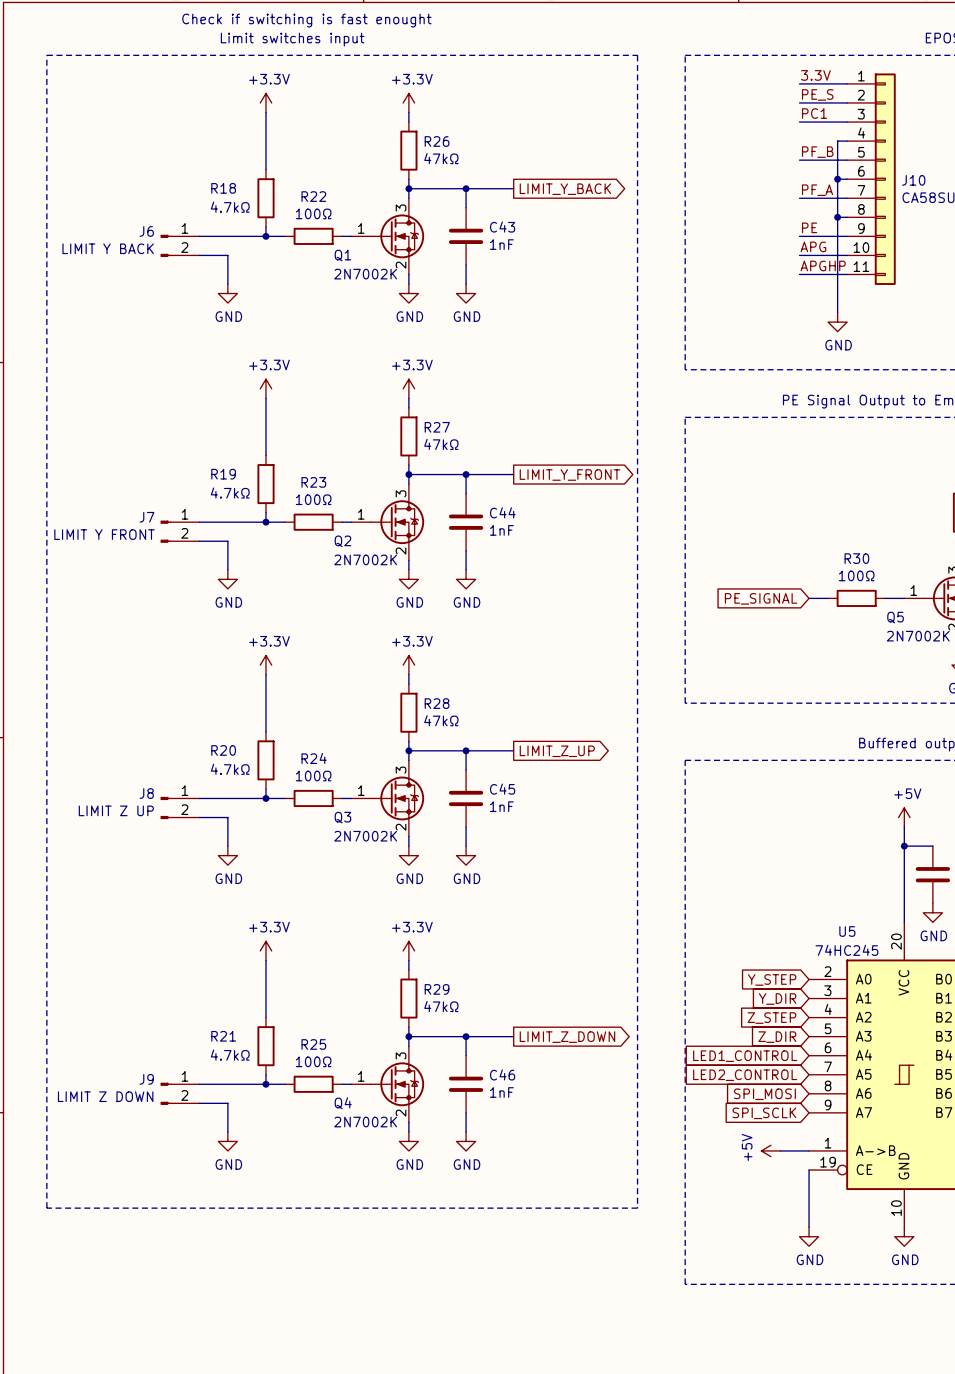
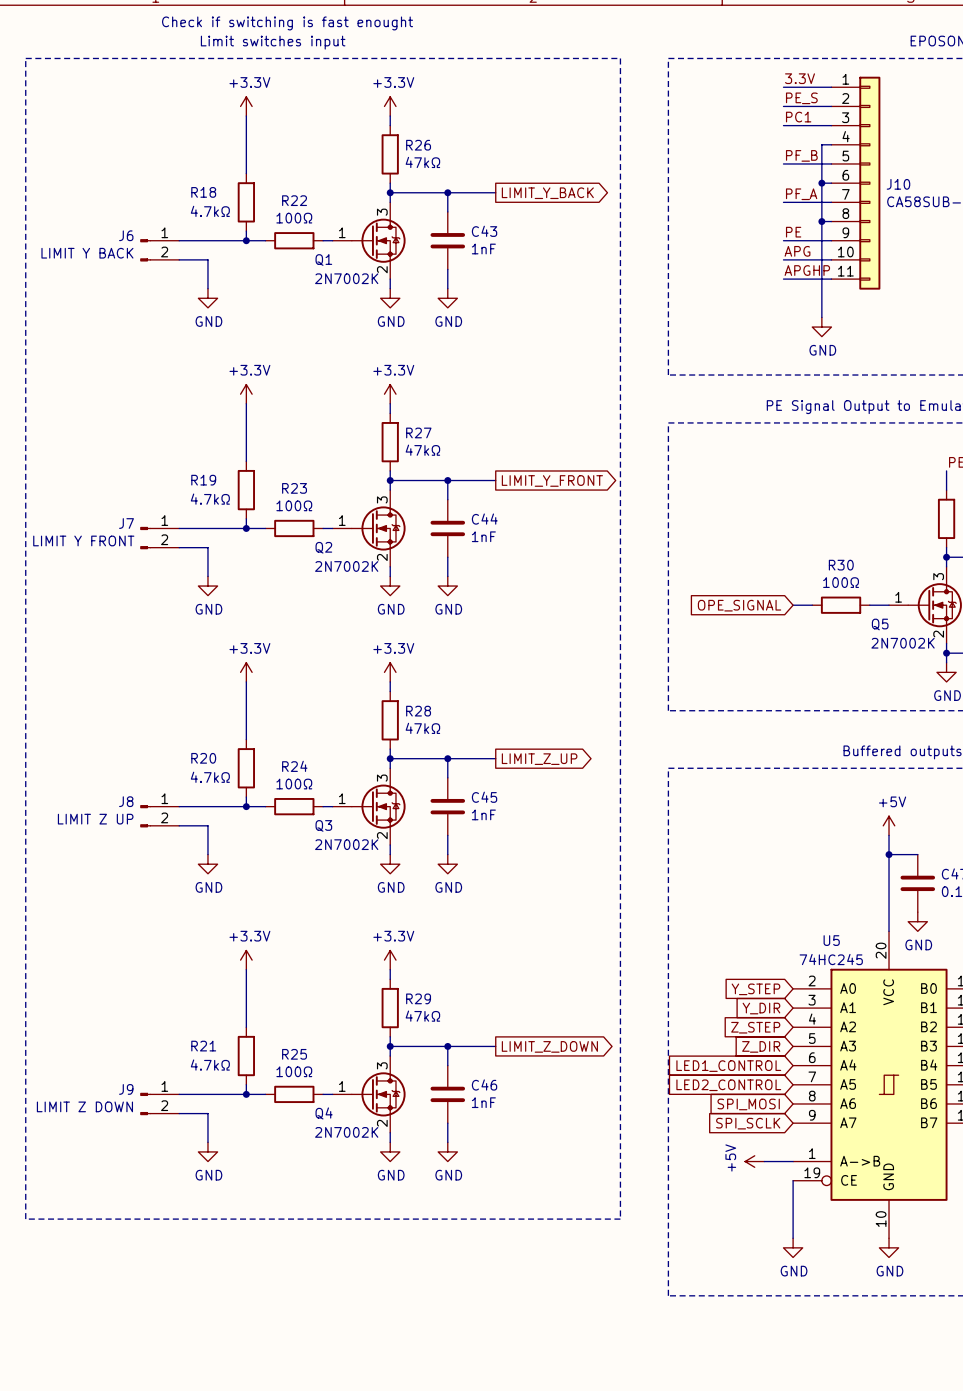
global label: PE_SIGNAL (761, 598) -> OPE_SIGNAL (739, 605)

